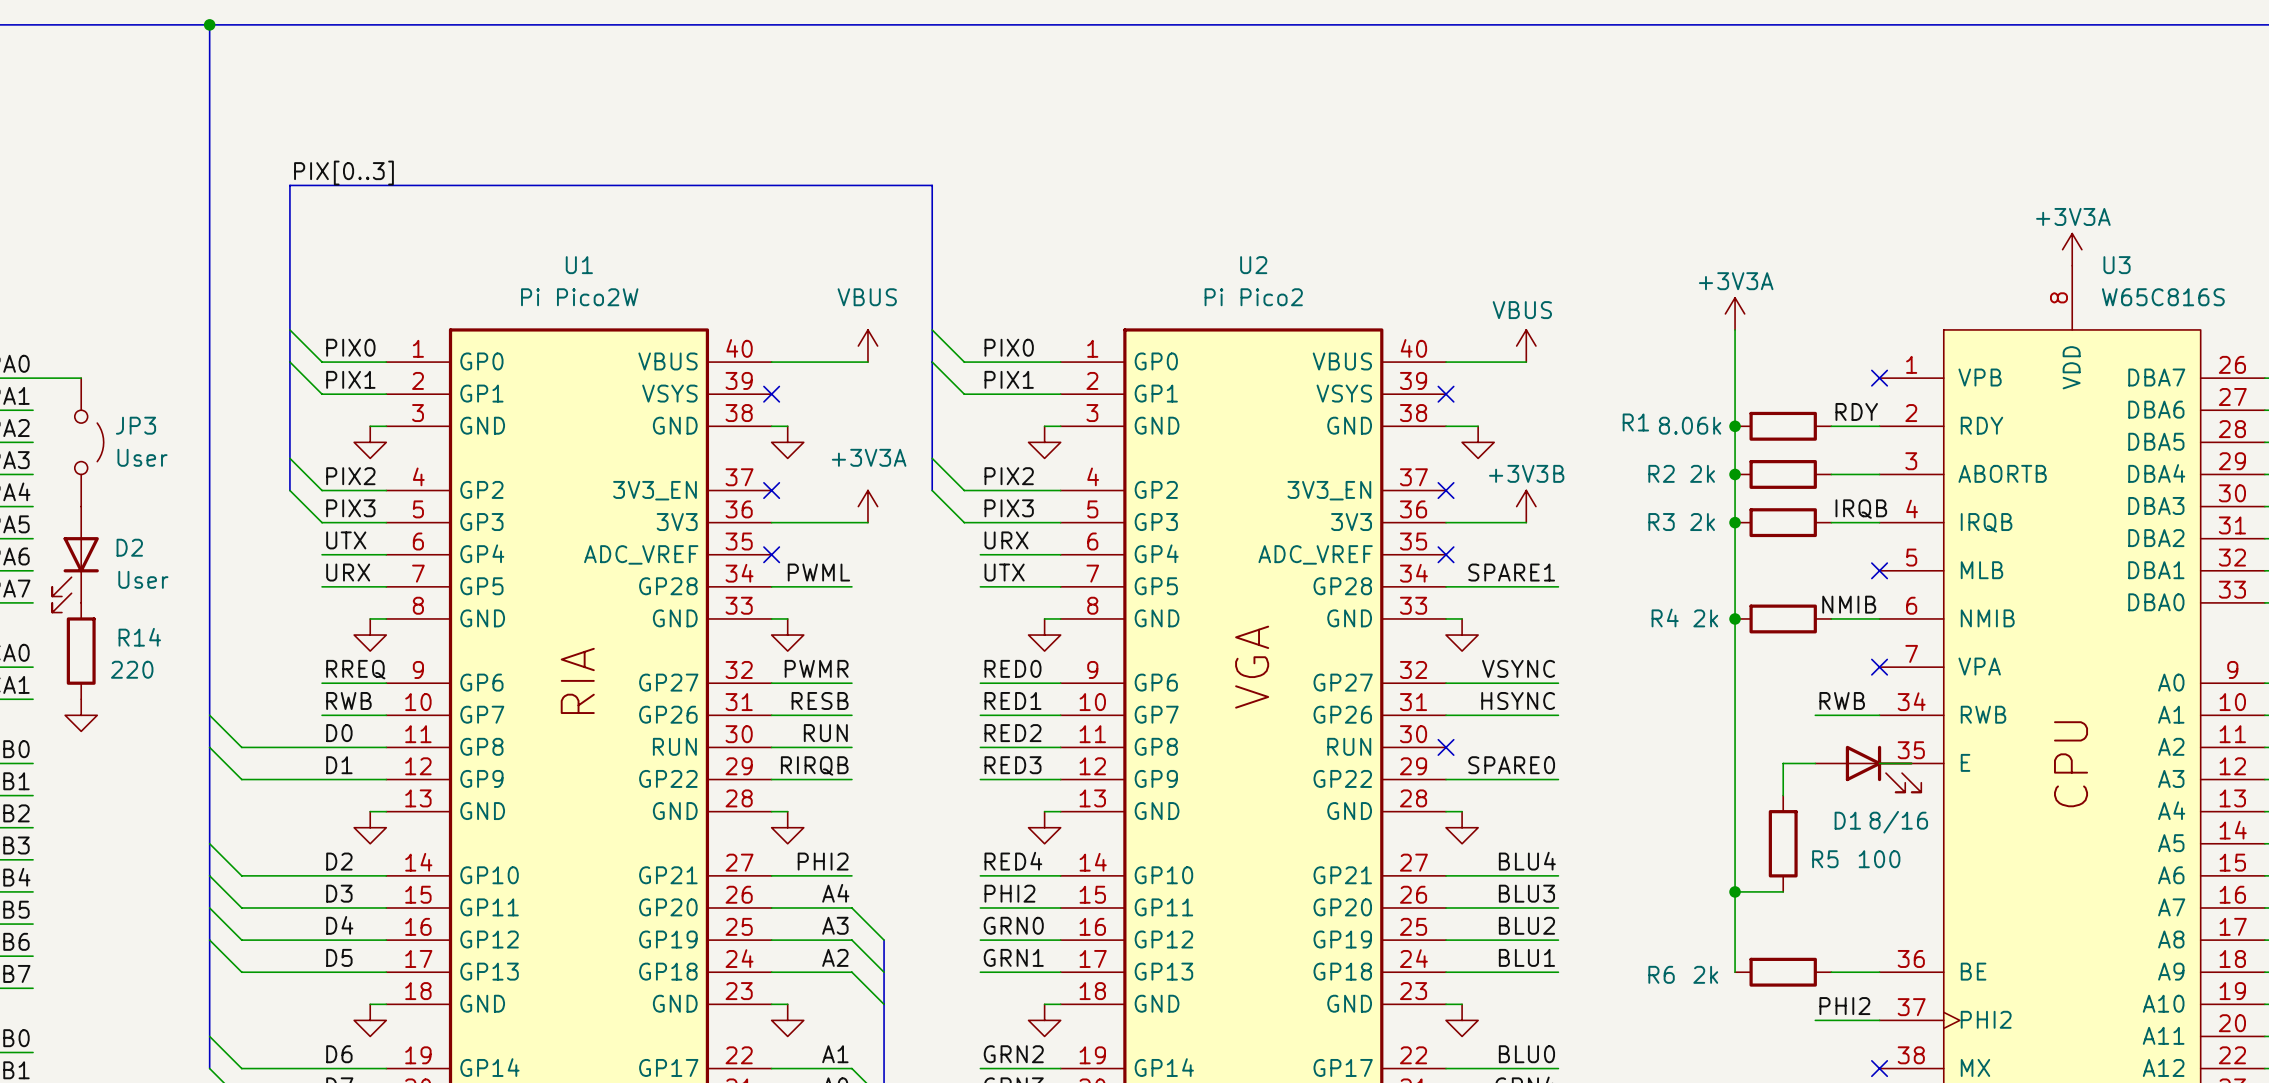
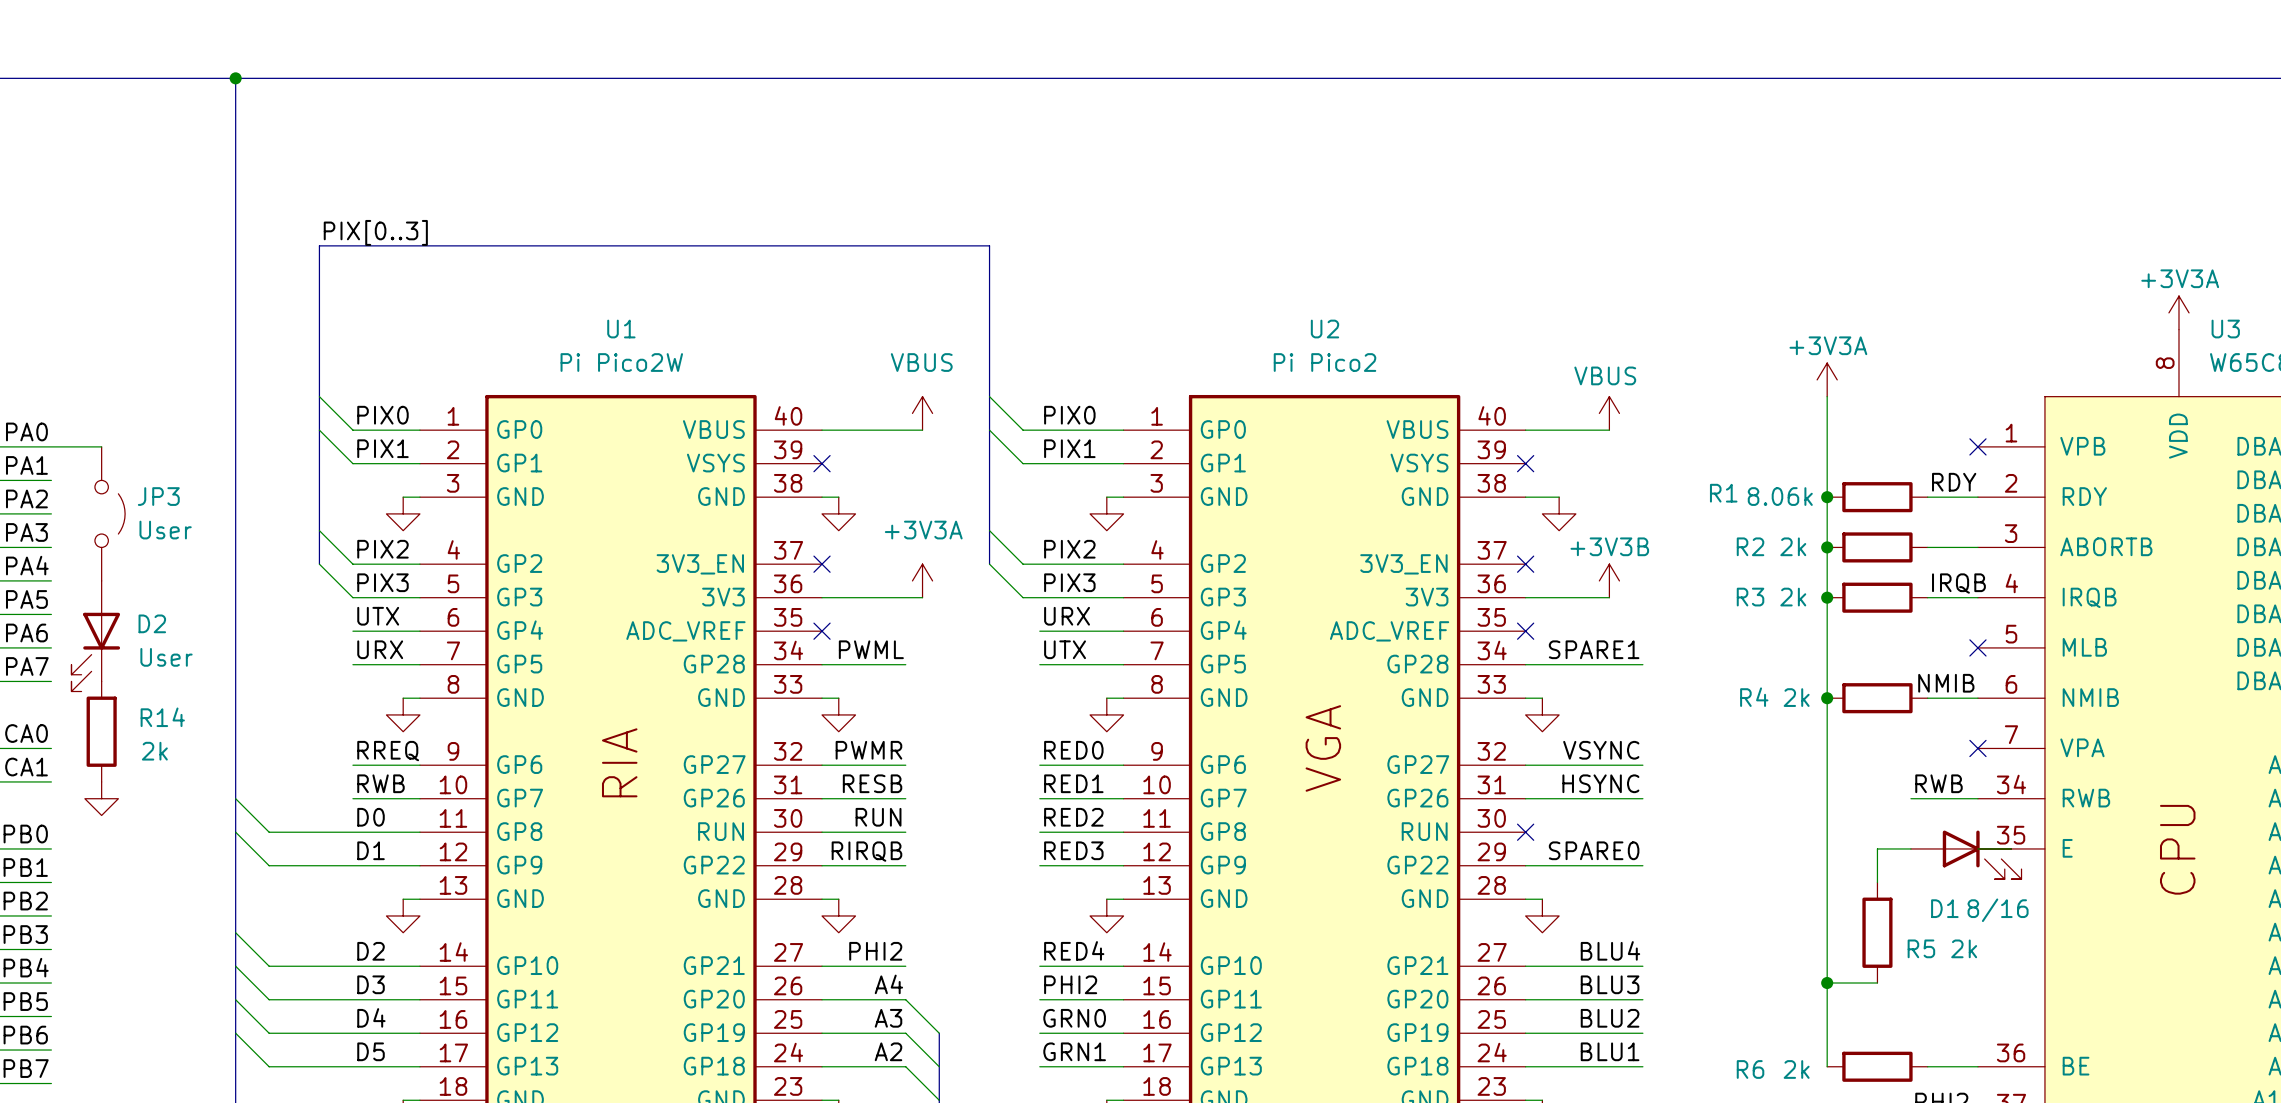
R14 value: 220 (132, 669) -> 2k (154, 751)
R5 value: 100 (1879, 859) -> 2k (1964, 948)

